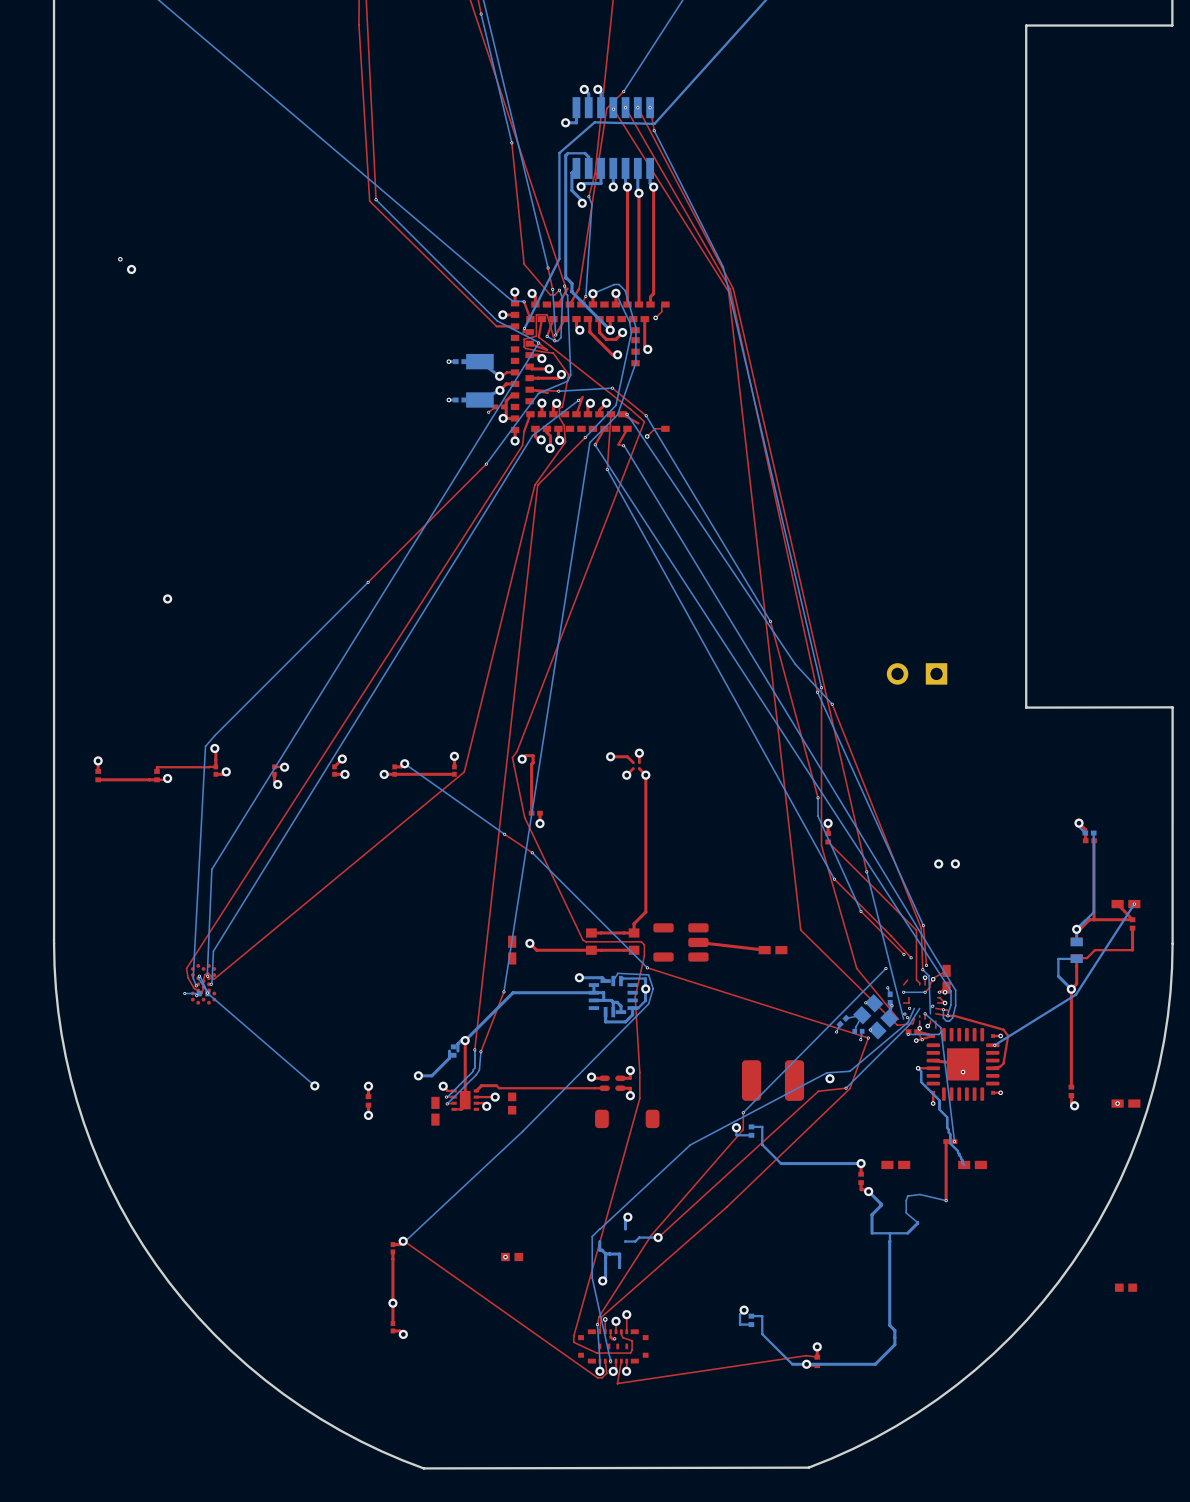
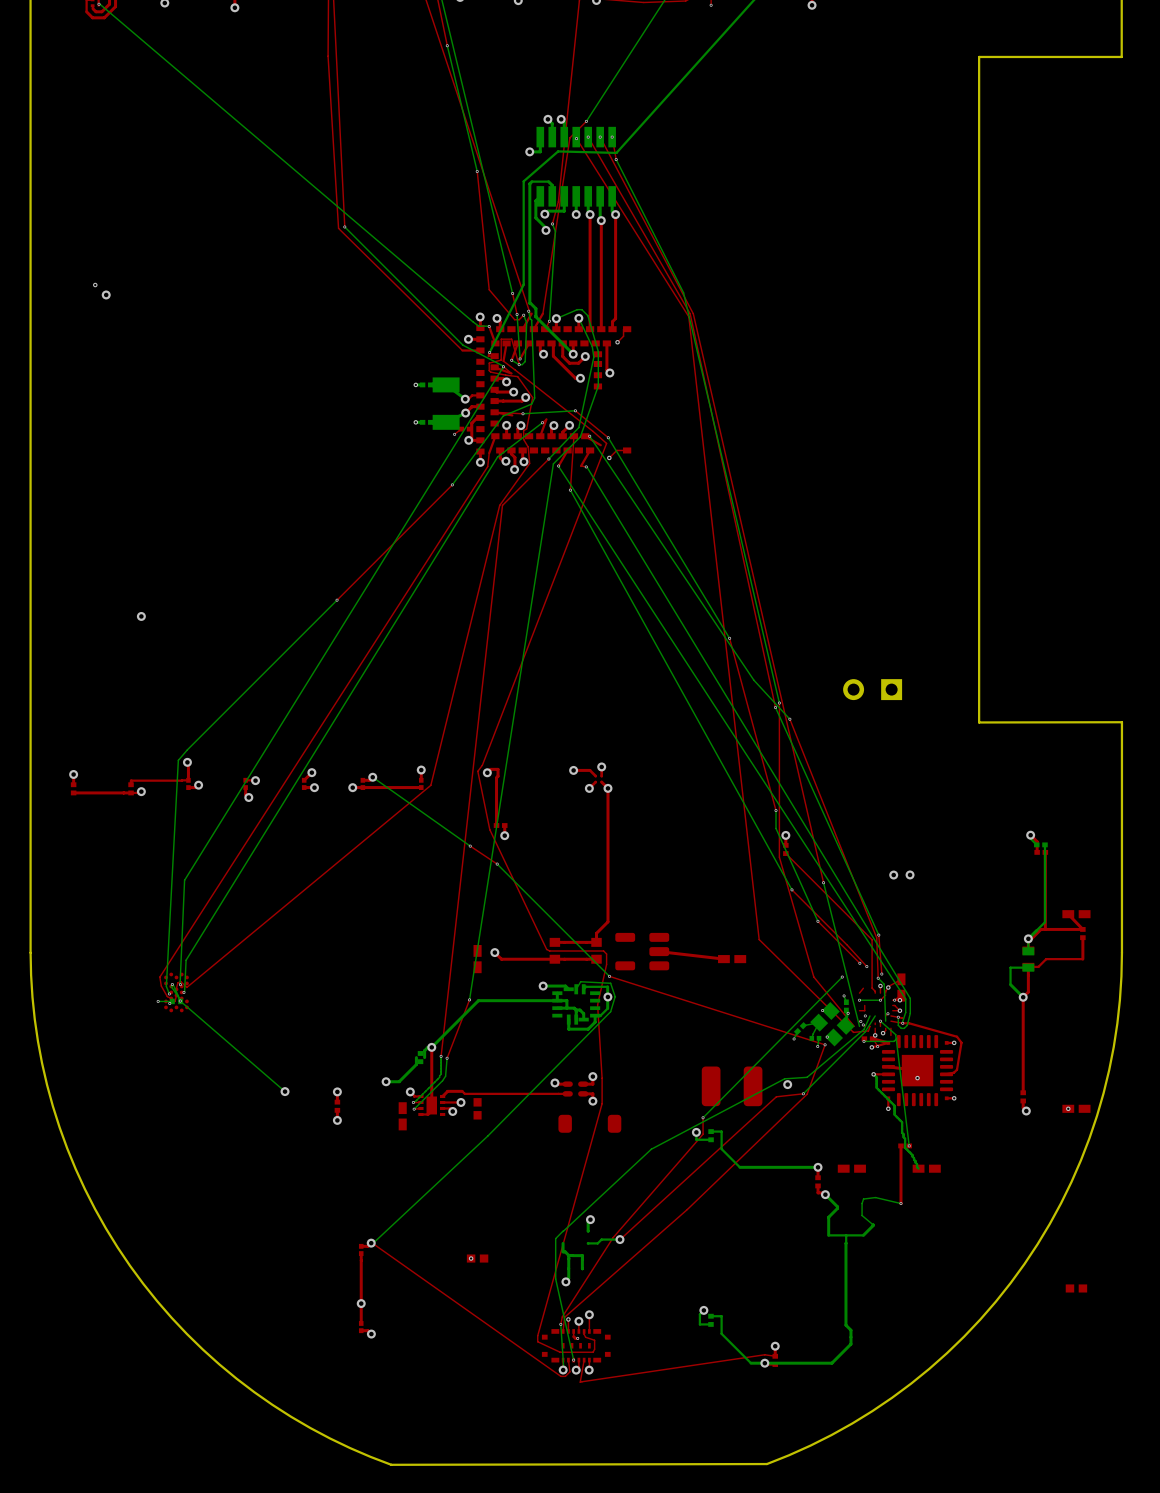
bottom track: (1134, 904) (1076, 994) (994, 1045) -> none
via: (1134, 904) -> none
via: (994, 1045) -> none

